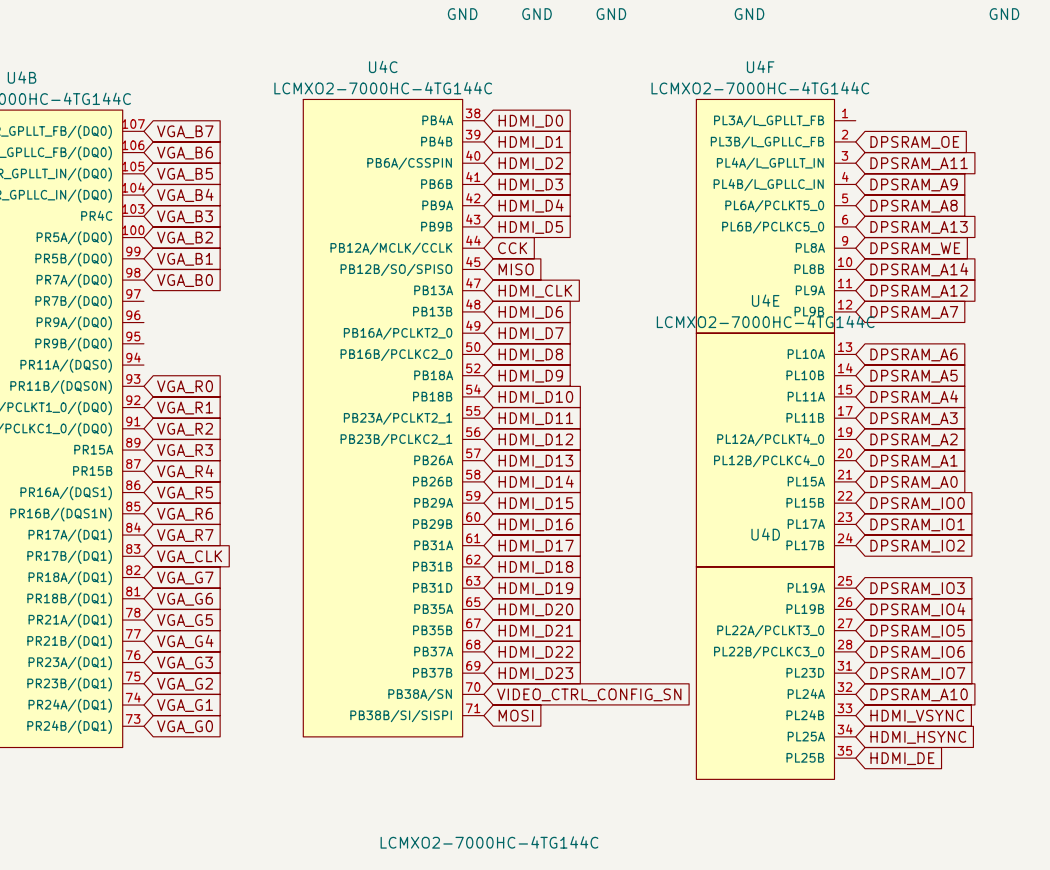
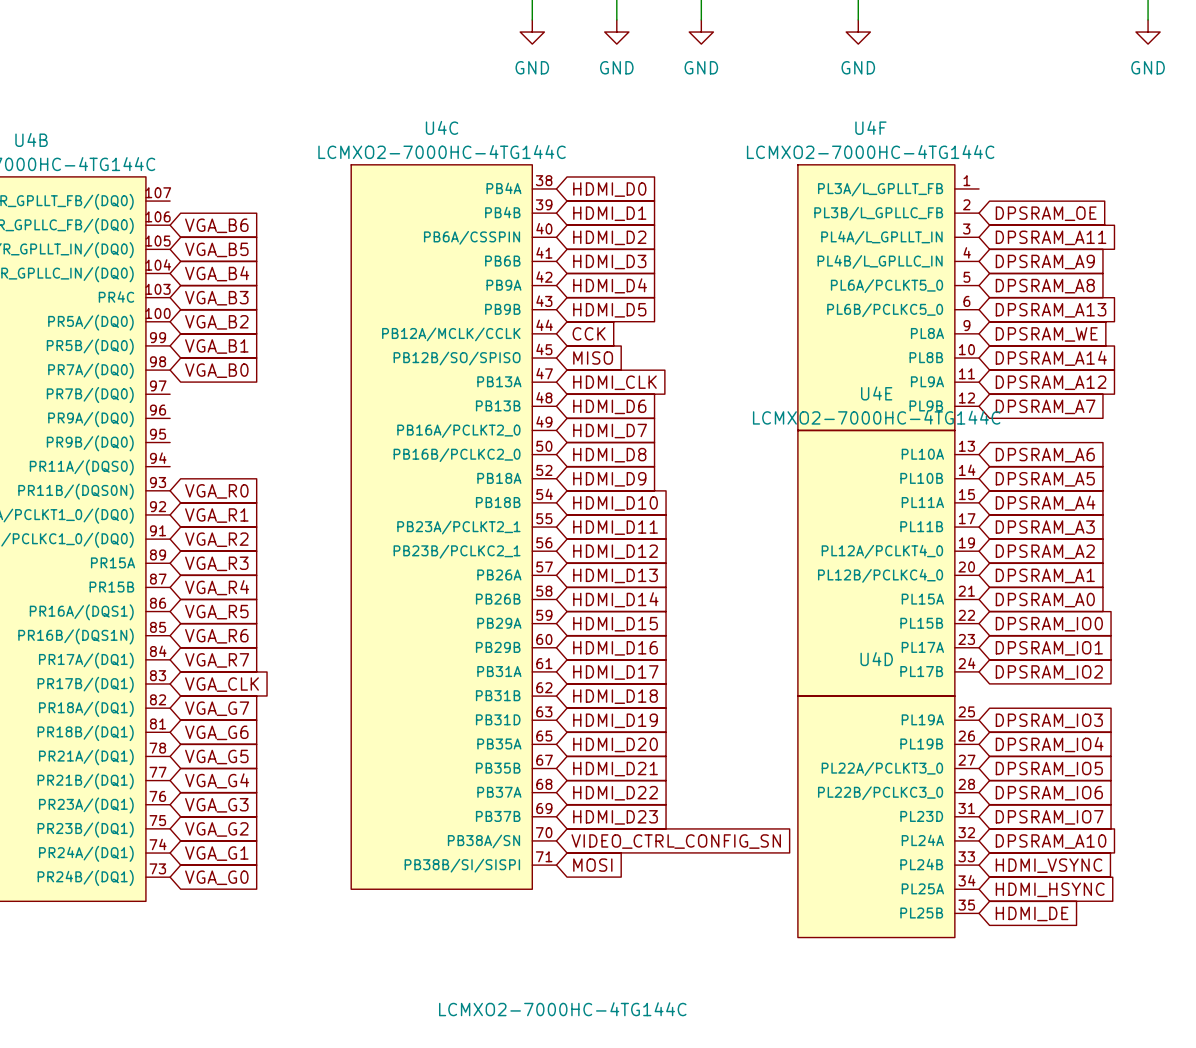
global label: VGA_B7 (185, 131) -> none

